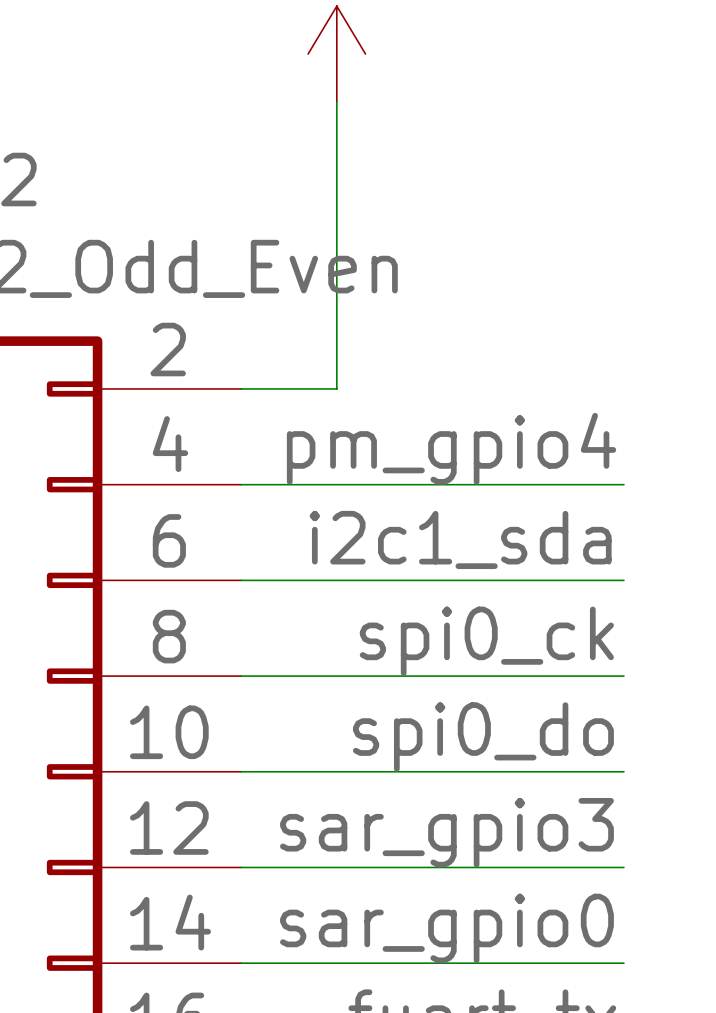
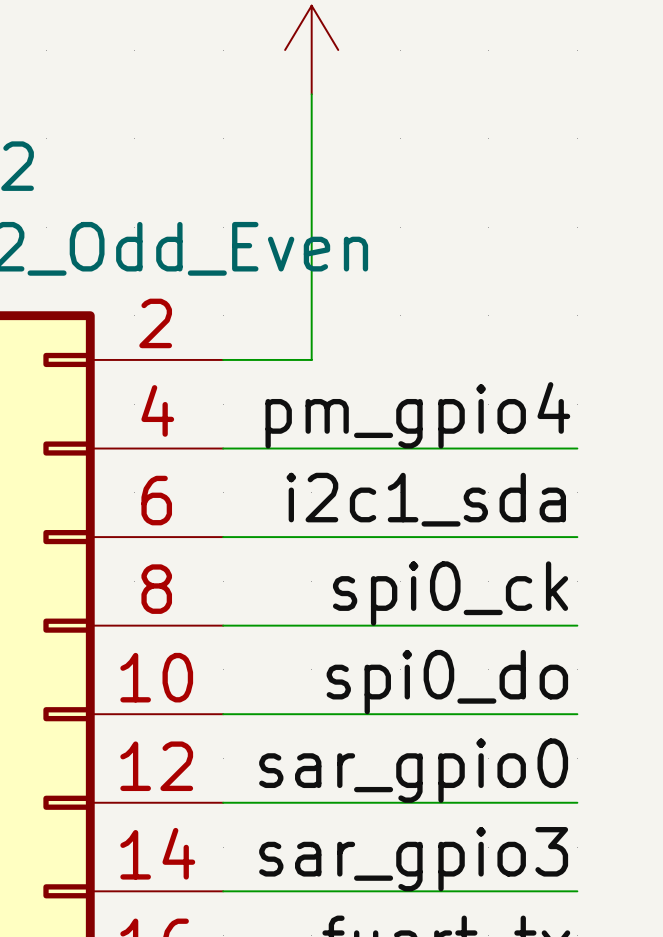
label: sar_gpio3 (446, 832) -> sar_gpio0 (413, 770)
label: sar_gpio0 (446, 928) -> sar_gpio3 (413, 859)

